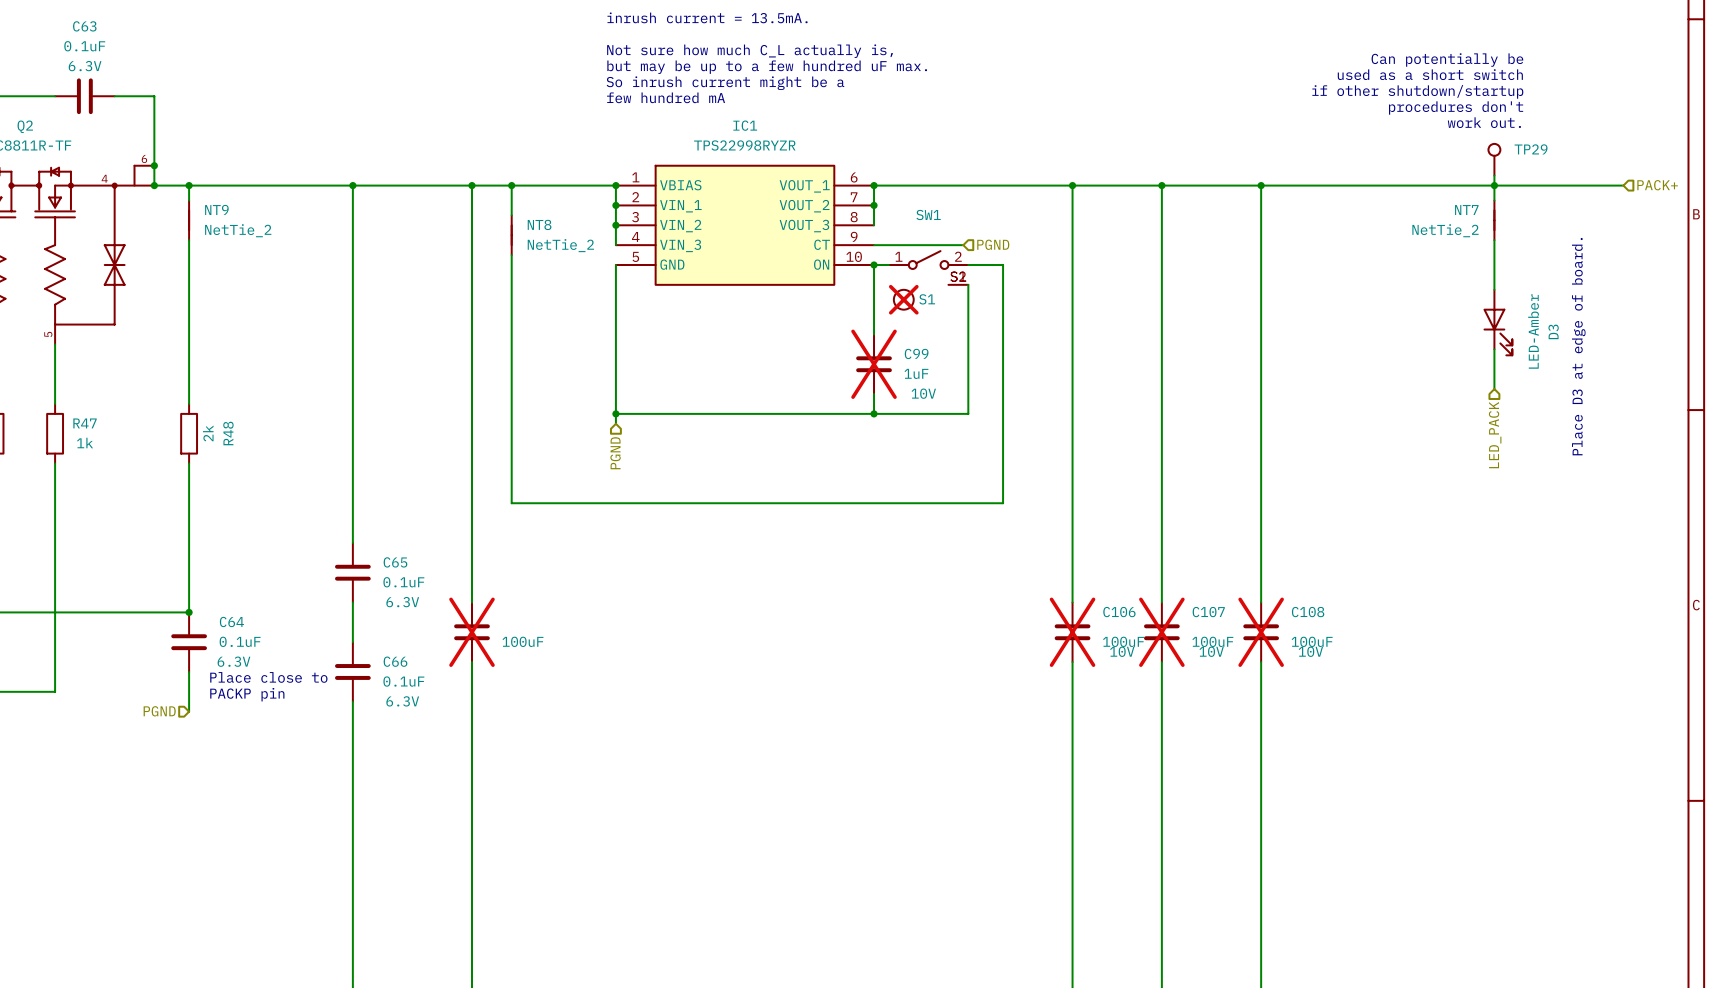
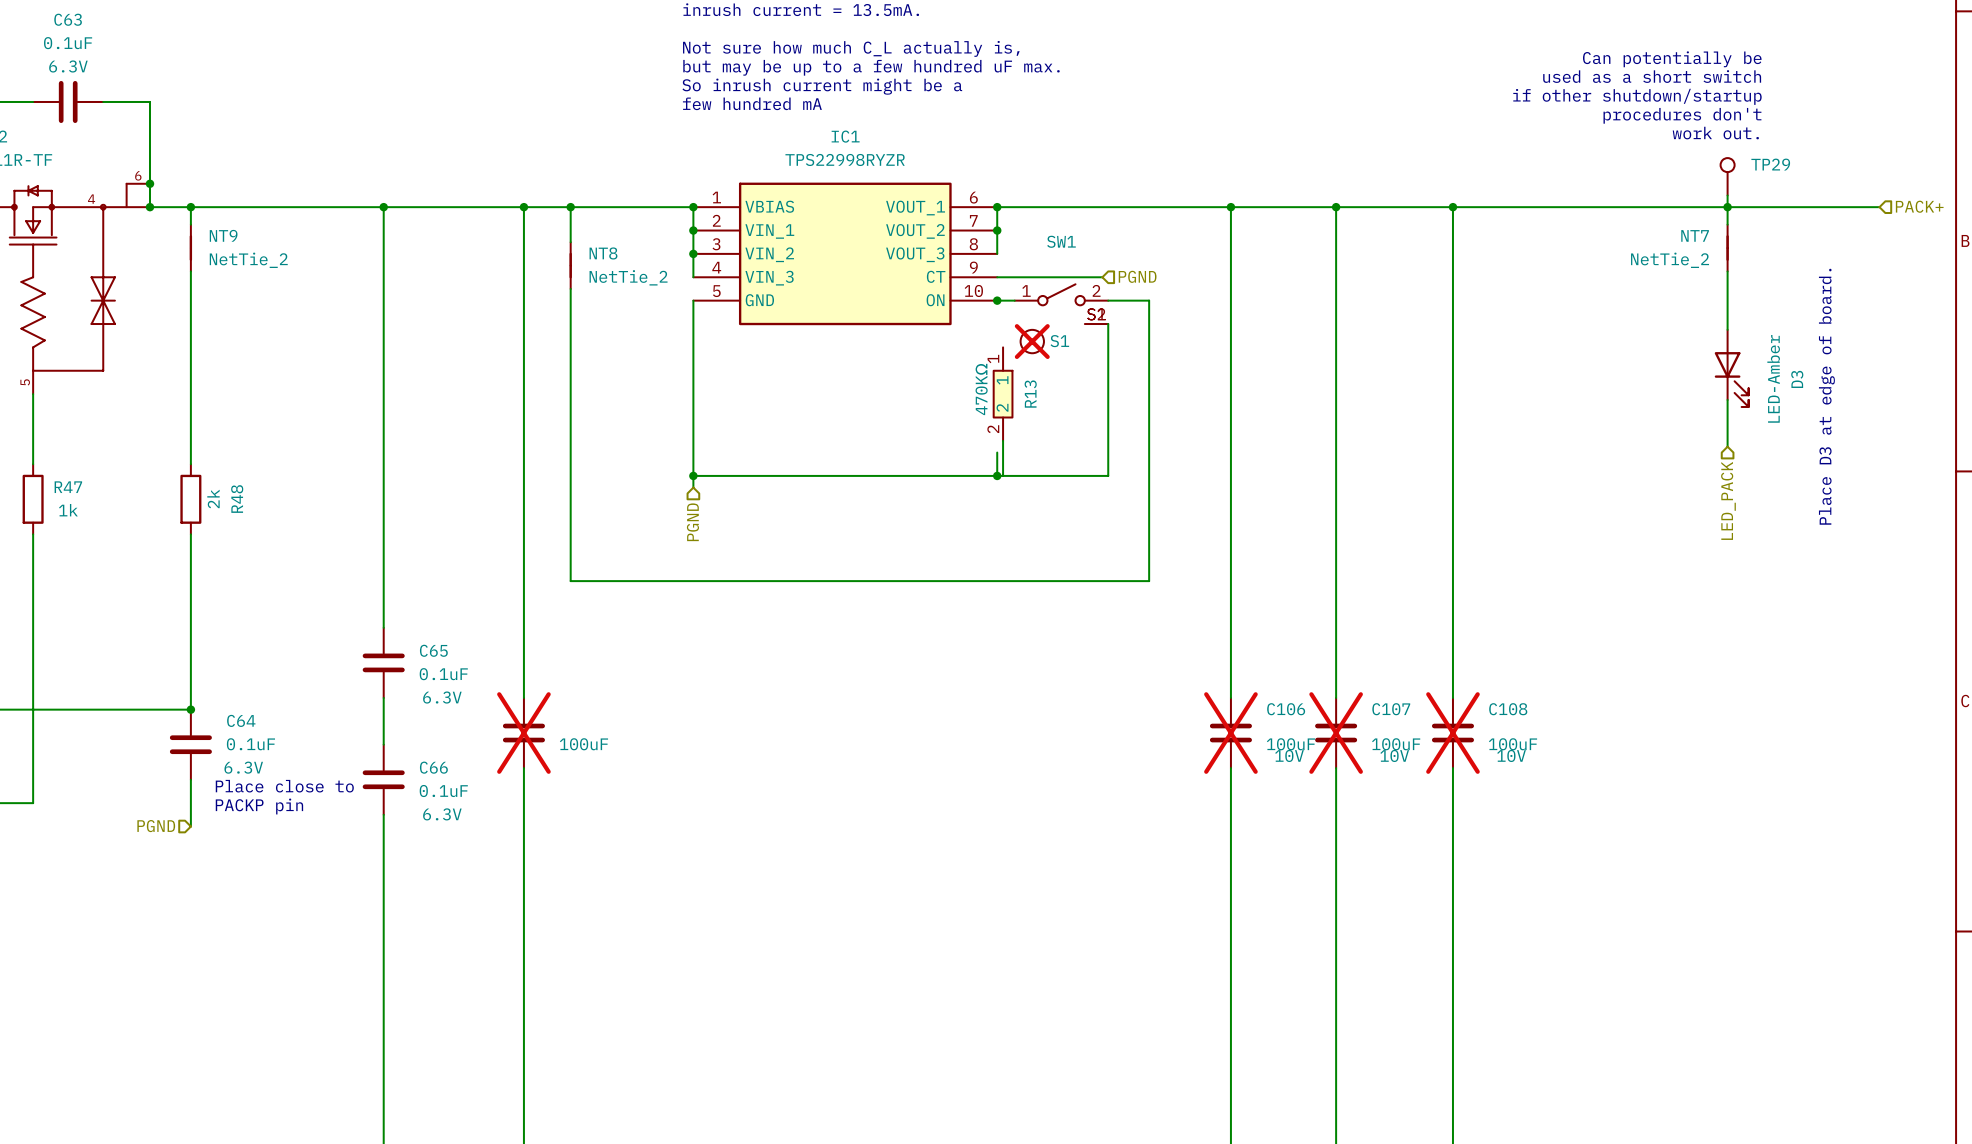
wire: (874, 265) (874, 334) -> none
R13: none -> (1003, 394)
C99: 1uF (874, 364) -> none
wire: none -> (1003, 440) (1003, 475)

